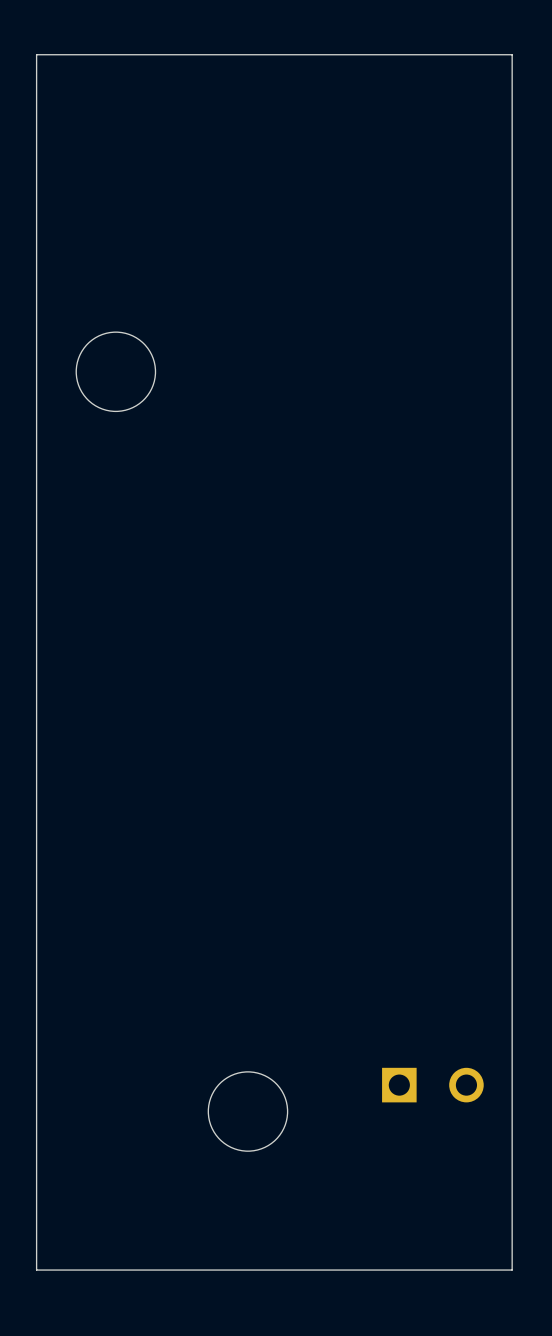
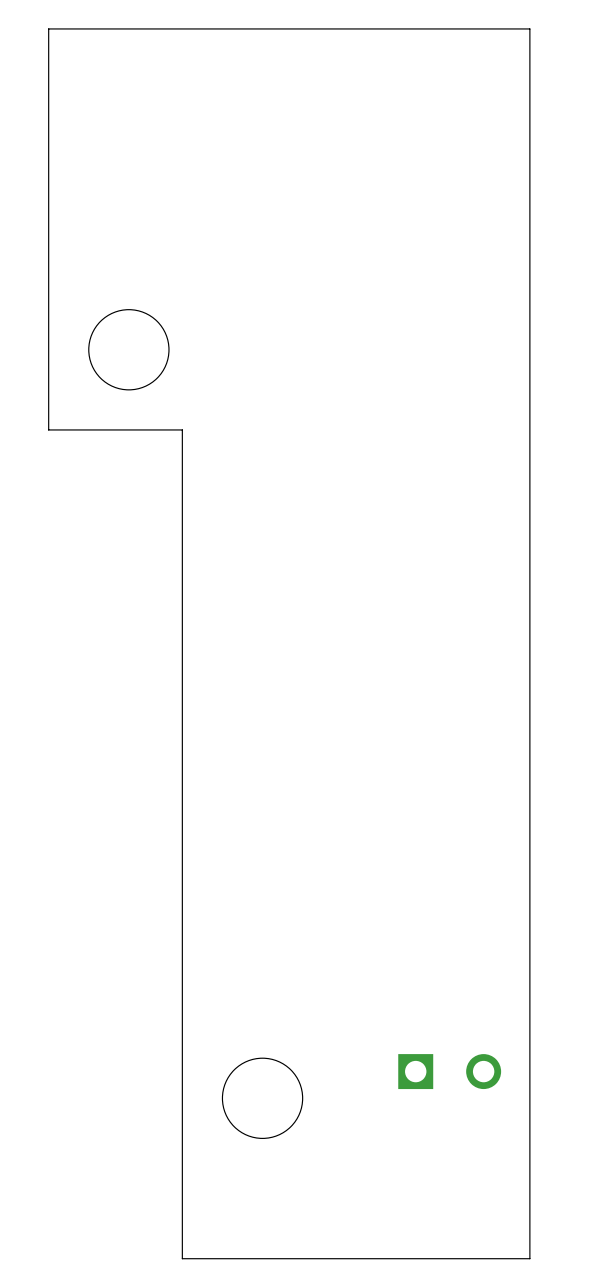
board edge: (36, 451) (36, 1270) (168, 1270) -> (48, 429) (182, 429) (182, 1258)

